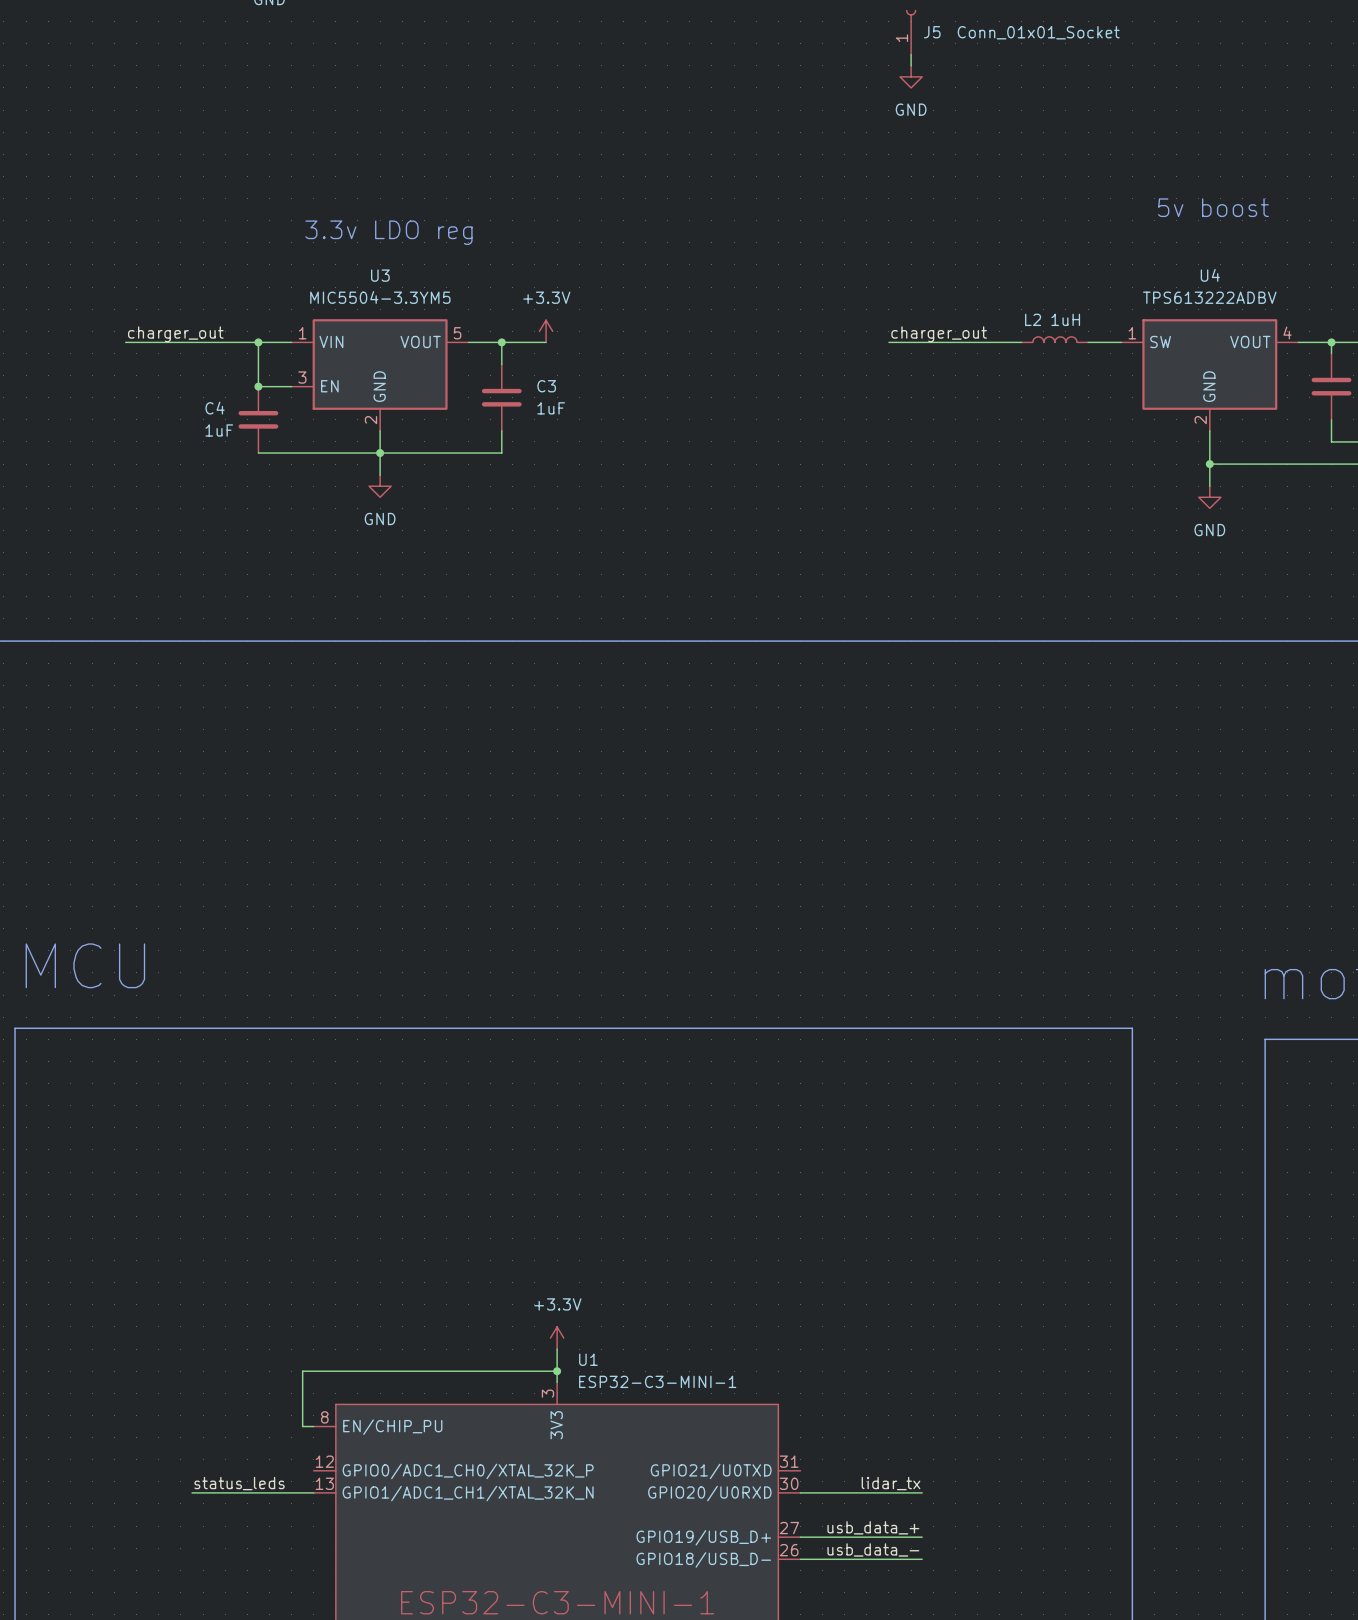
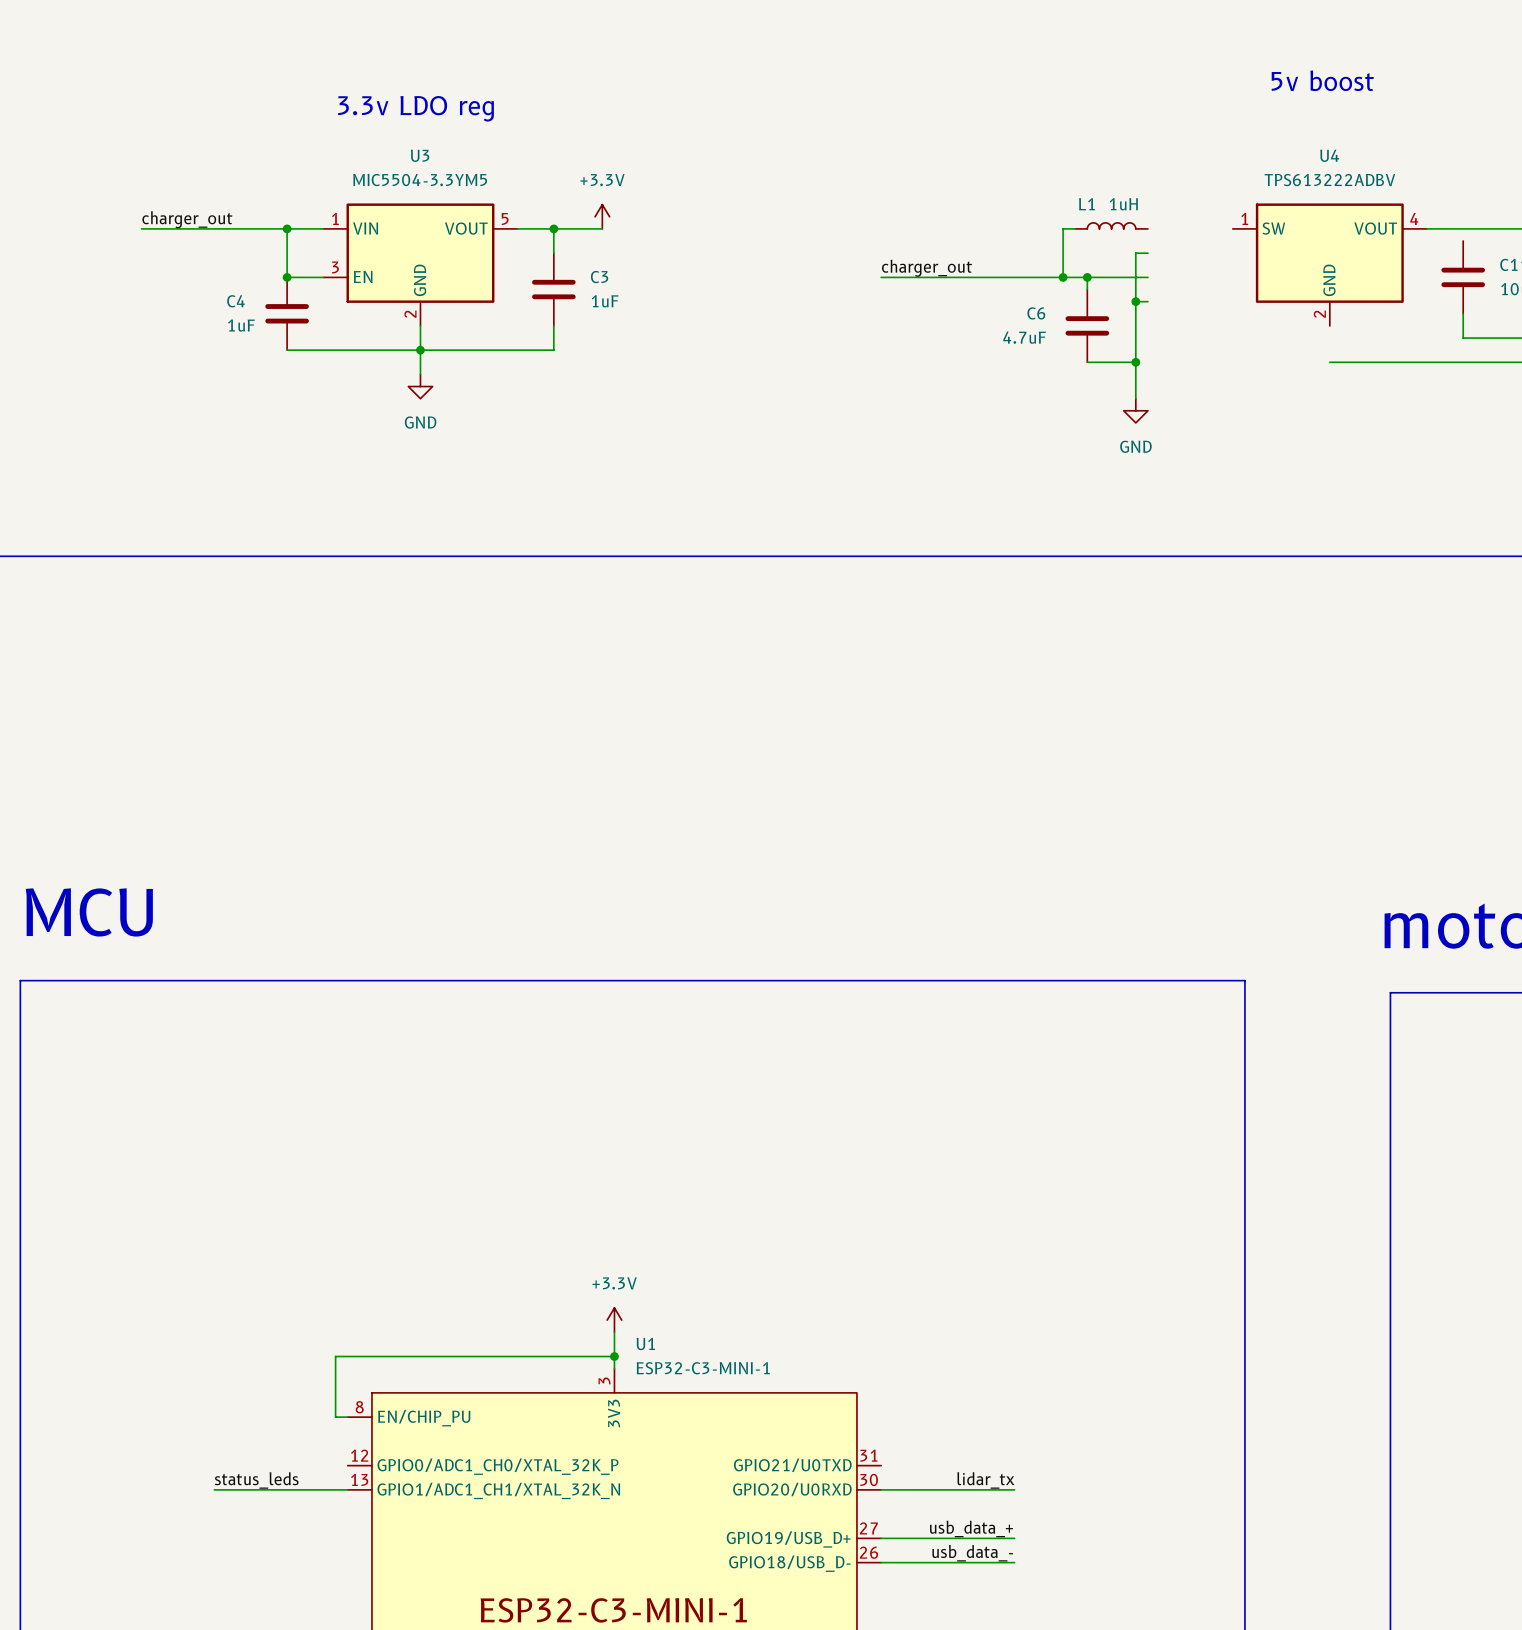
label position: charger_out (939, 334) -> charger_out (926, 268)
L1: none -> 1uH (1111, 225)
L2: 1uH (1054, 339) -> none
wire: (888, 342) (966, 342) -> (1063, 277) (1063, 228)
wire: (977, 342) (1021, 342) -> (1087, 362) (1135, 362)
wire: (1088, 342) (1121, 342) -> none
wire: (1331, 342) (1331, 353) -> none
junction: (1331, 342) -> none
wire: none -> (1147, 253) (1135, 253) (1135, 398)
wire: none -> (881, 277) (1147, 277)
junction: none -> (1063, 277)
wire: none -> (1087, 277) (1087, 289)
junction: none -> (1087, 277)
wire: none -> (1135, 301) (1147, 301)
junction: none -> (1135, 301)
C6: none -> 4.7uF (1087, 325)
wire: (1209, 430) (1209, 486) -> none
junction: none -> (1135, 362)
junction: (1209, 464) -> none
power symbol position: GND (1209, 497) -> GND (1135, 410)

